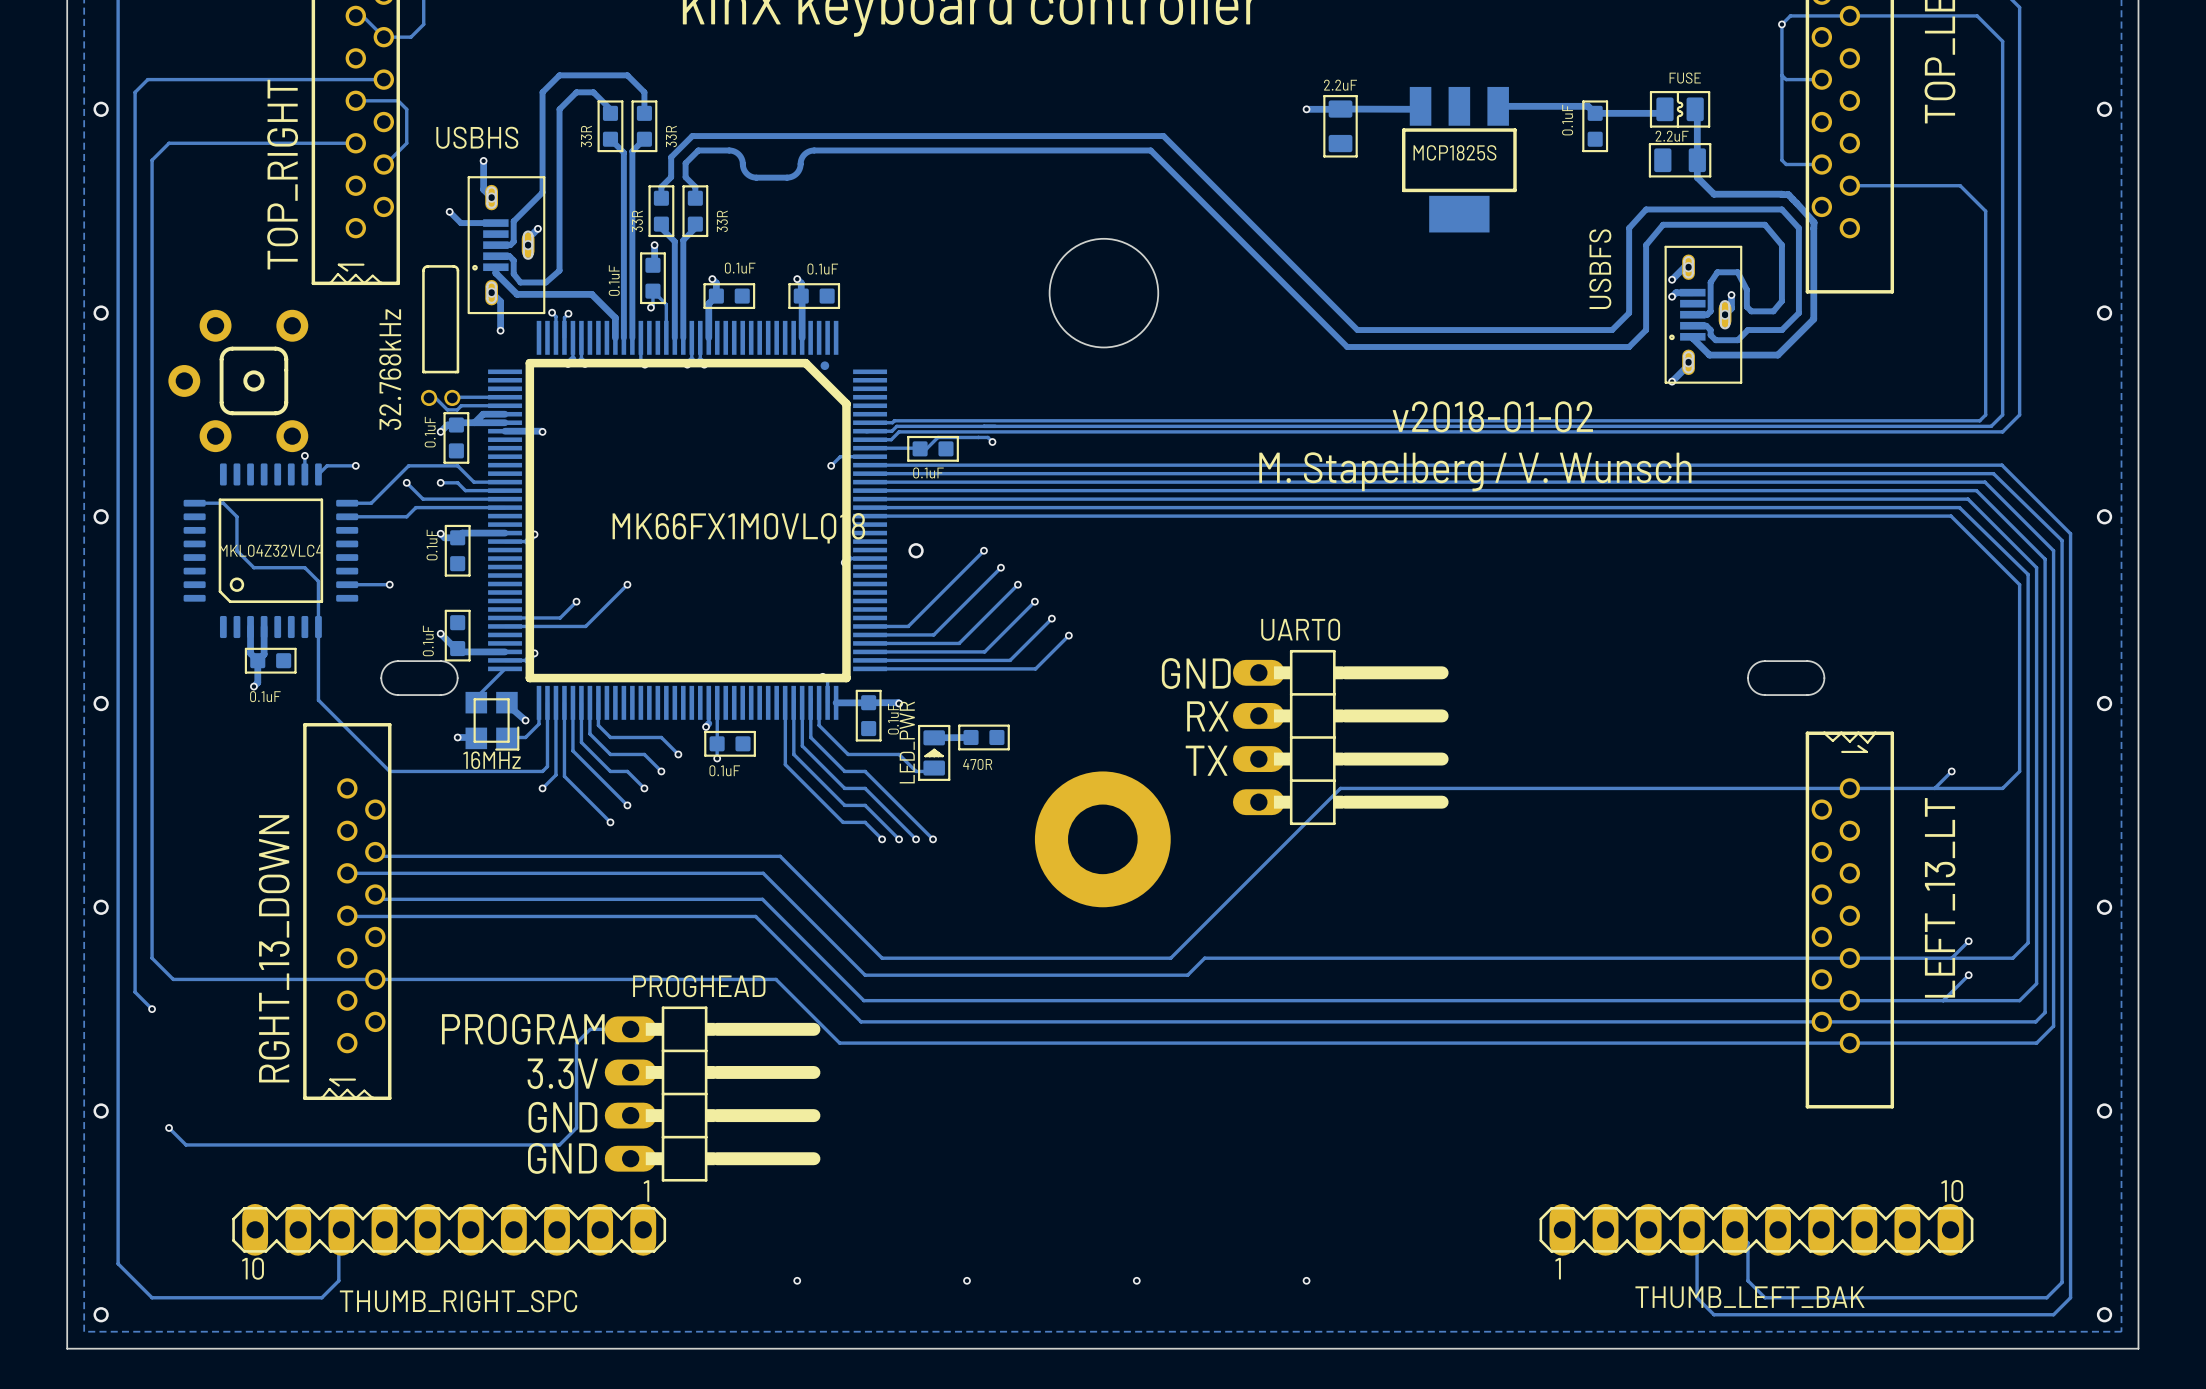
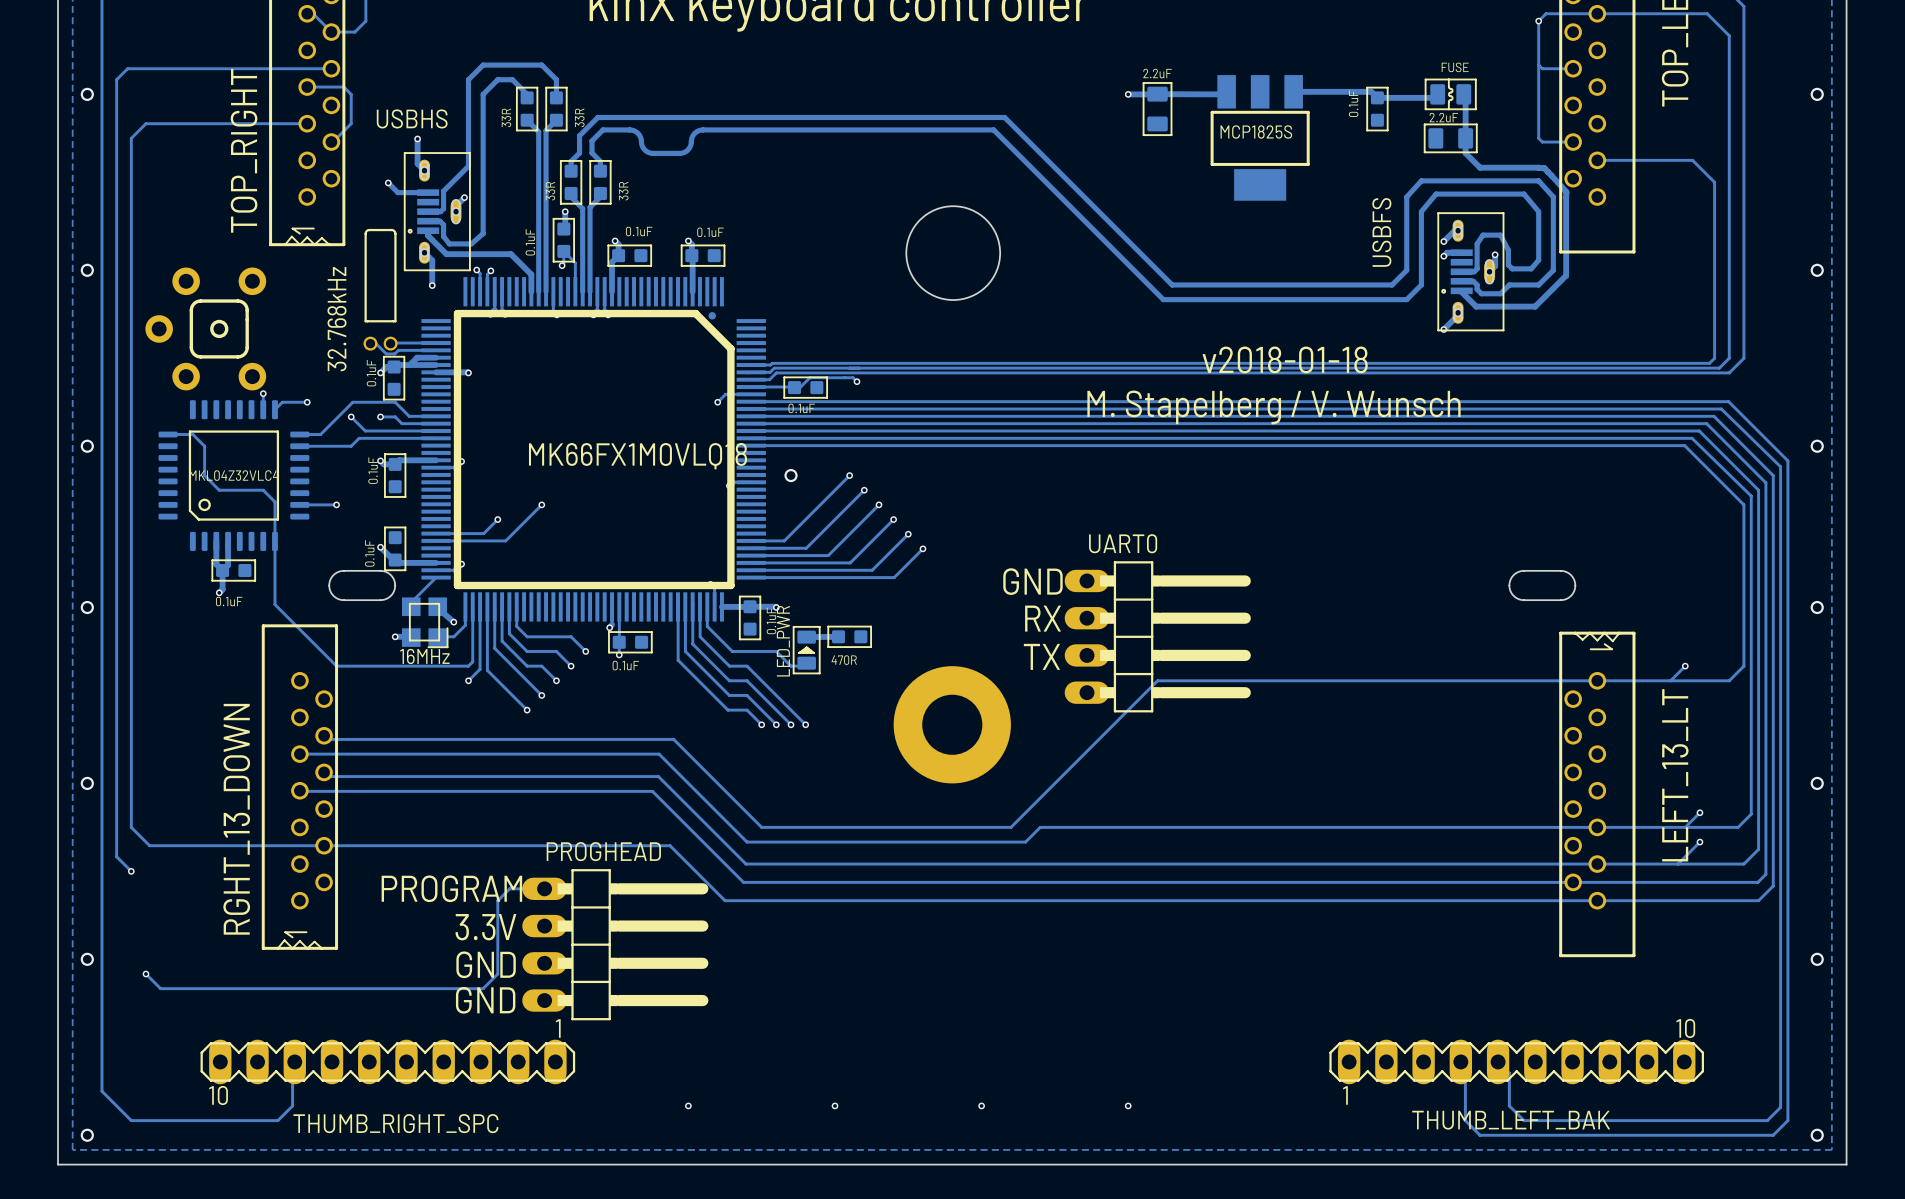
text: v2018-01-02 (1492, 416) -> v2018-01-18 (1285, 359)

